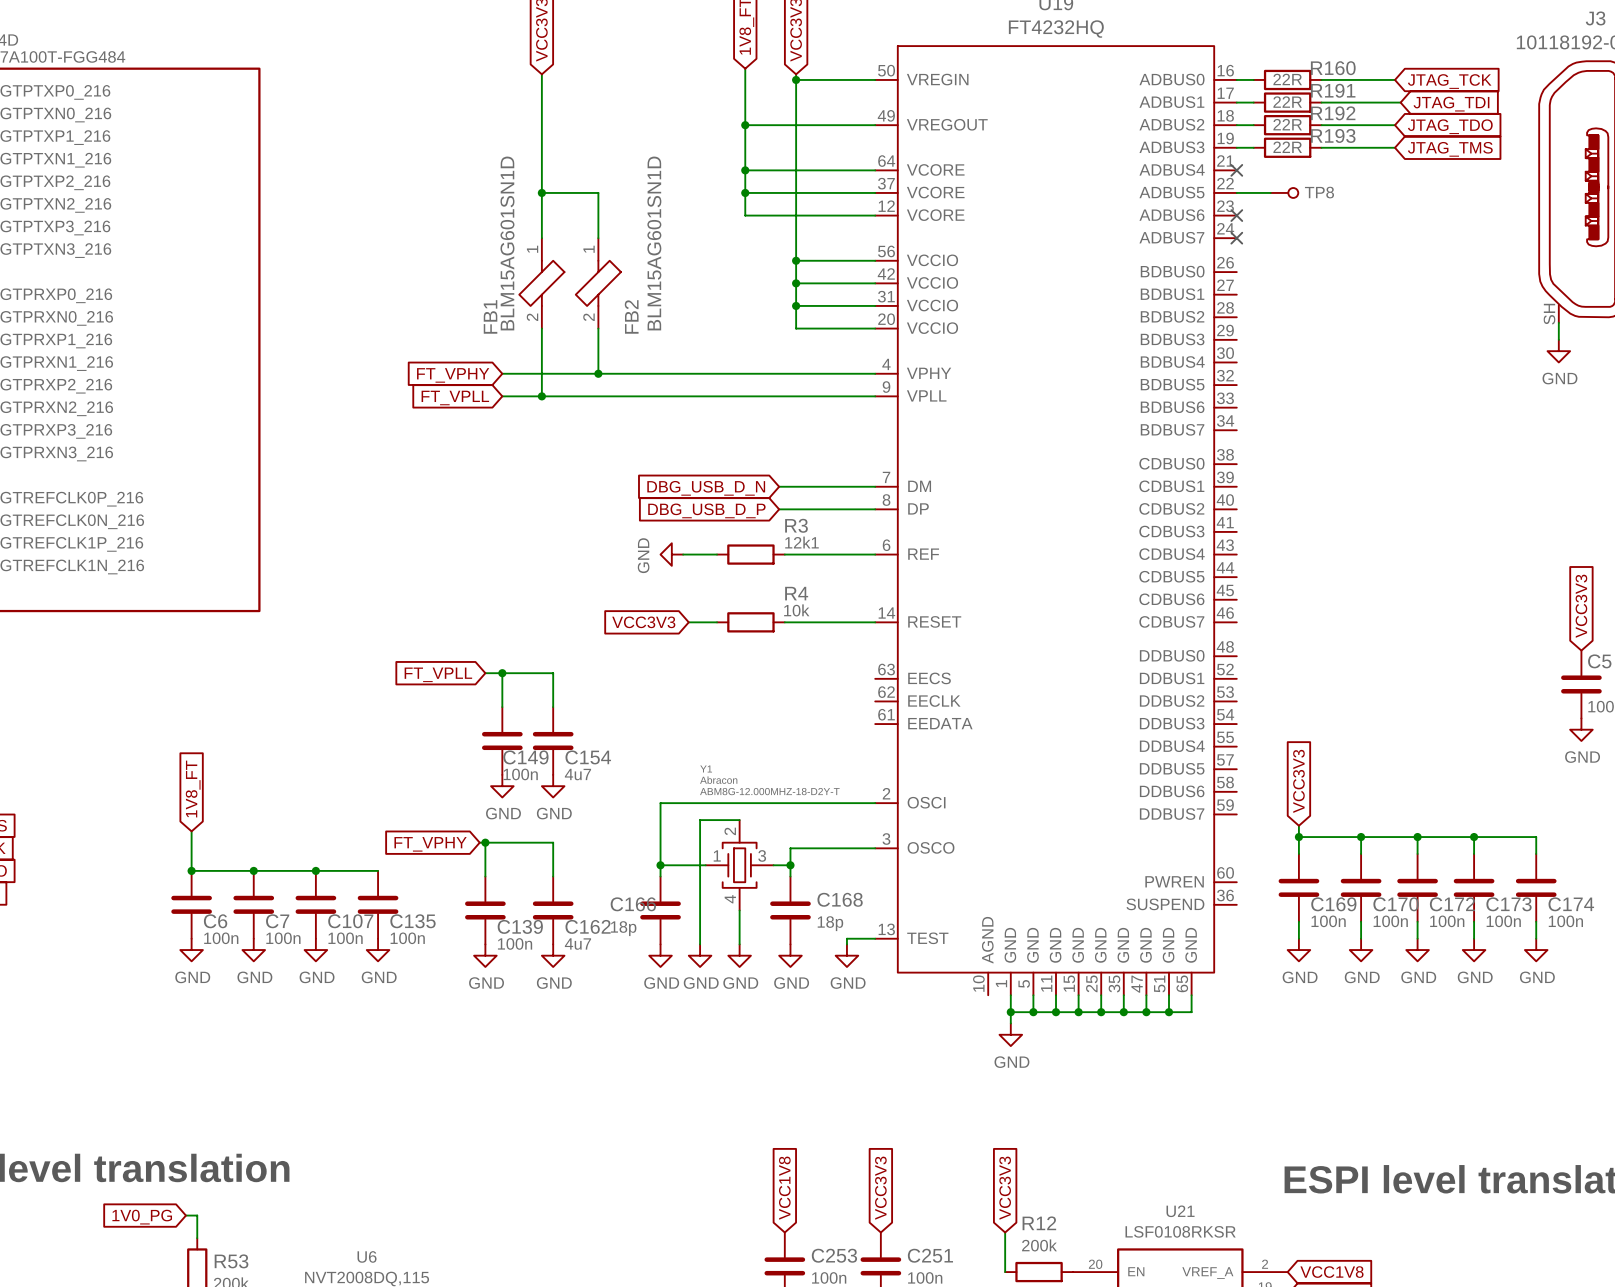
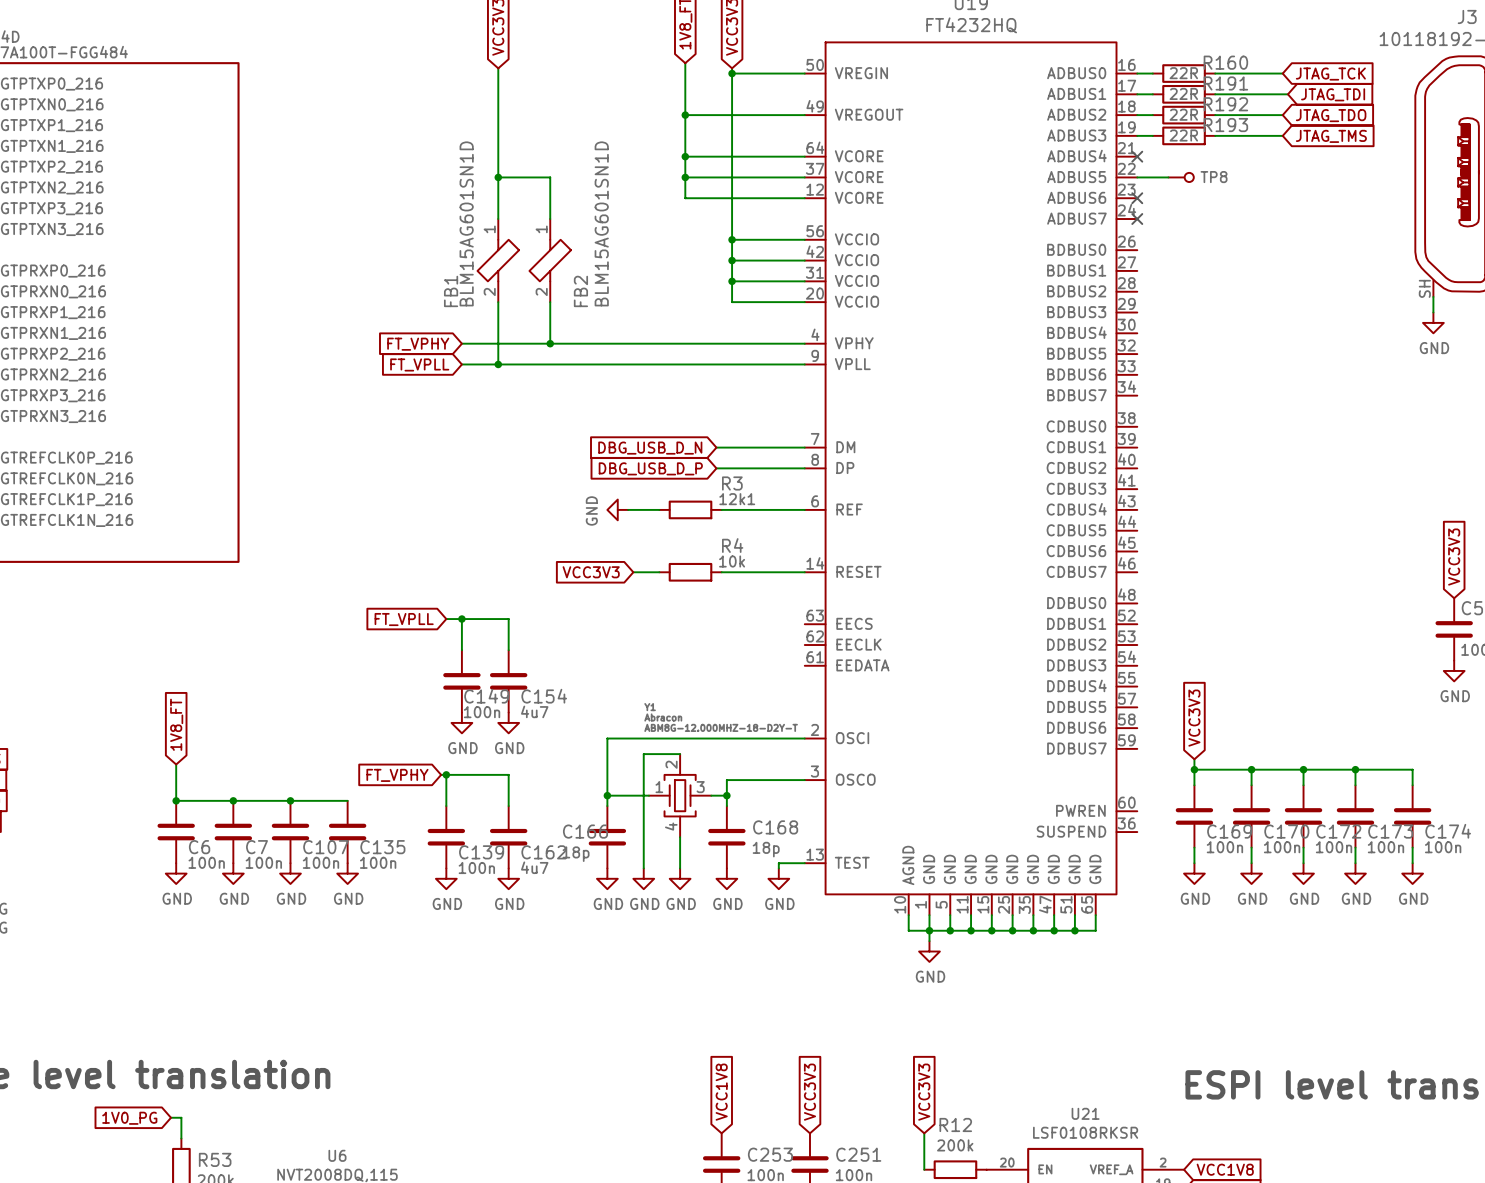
wire: none -> (908, 915) (908, 930) (929, 930)

